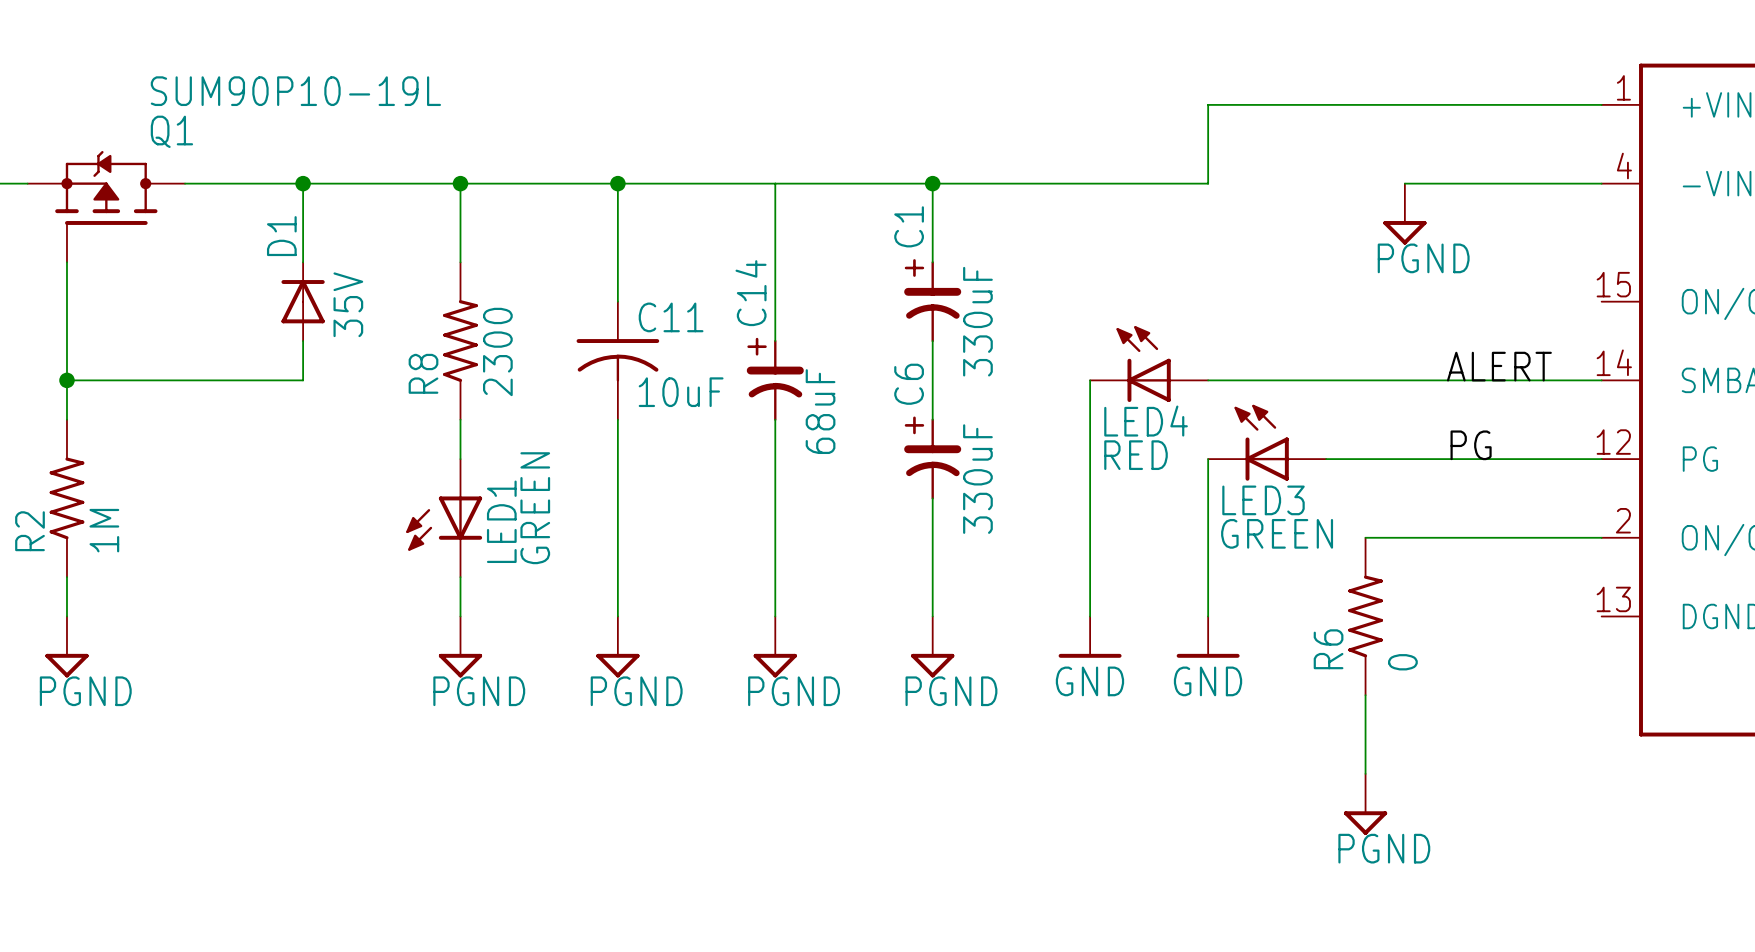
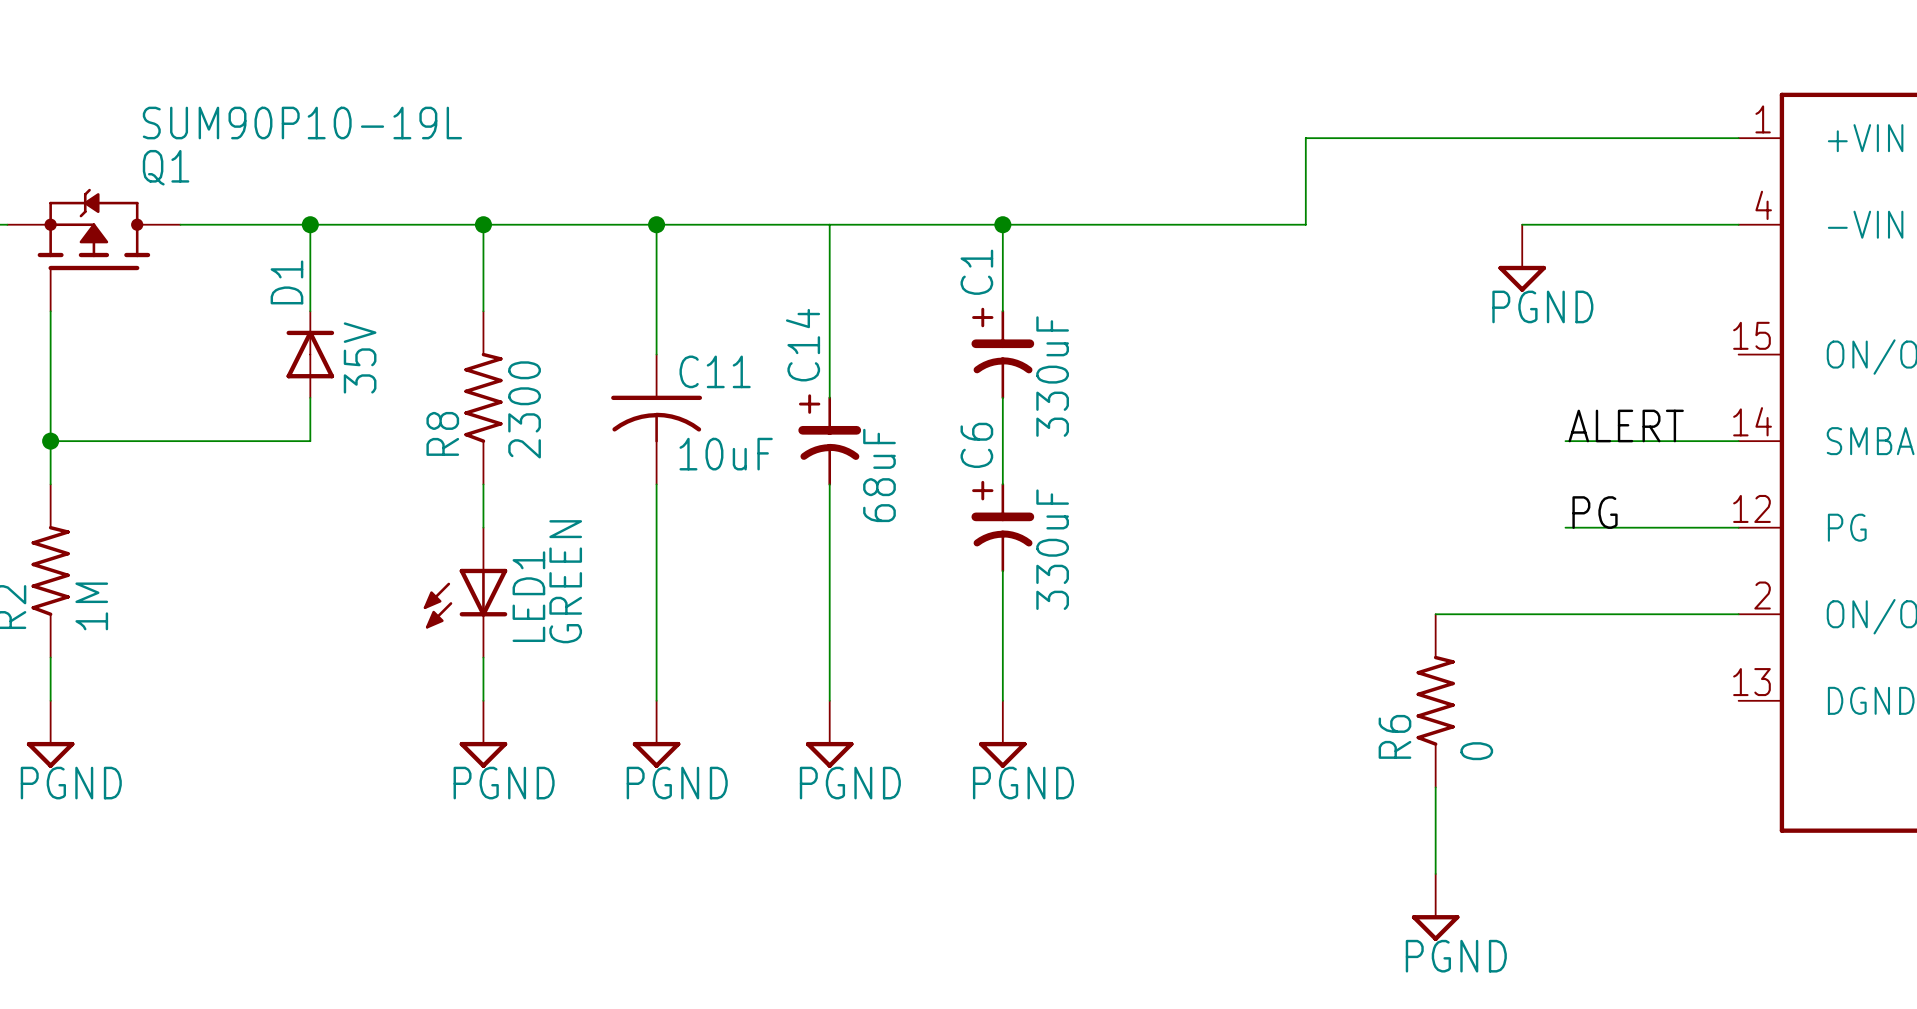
LED4: RED (1149, 364) -> none
wire: (1090, 380) (1090, 616) -> none
wire: (1208, 380) (1444, 380) -> none
LED3: GREEN (1267, 442) -> none
wire: (1208, 459) (1208, 616) -> none
wire: (1326, 459) (1444, 459) -> none
wire: none -> (1435, 614) (1478, 614)
R6 position: (1365, 616) -> (1435, 700)
power symbol: GND (1090, 637) -> none
power symbol: GND (1208, 637) -> none
wire: (1365, 695) (1365, 773) -> (1435, 787) (1435, 873)
power symbol position: PGND (1365, 804) -> PGND (1435, 907)

